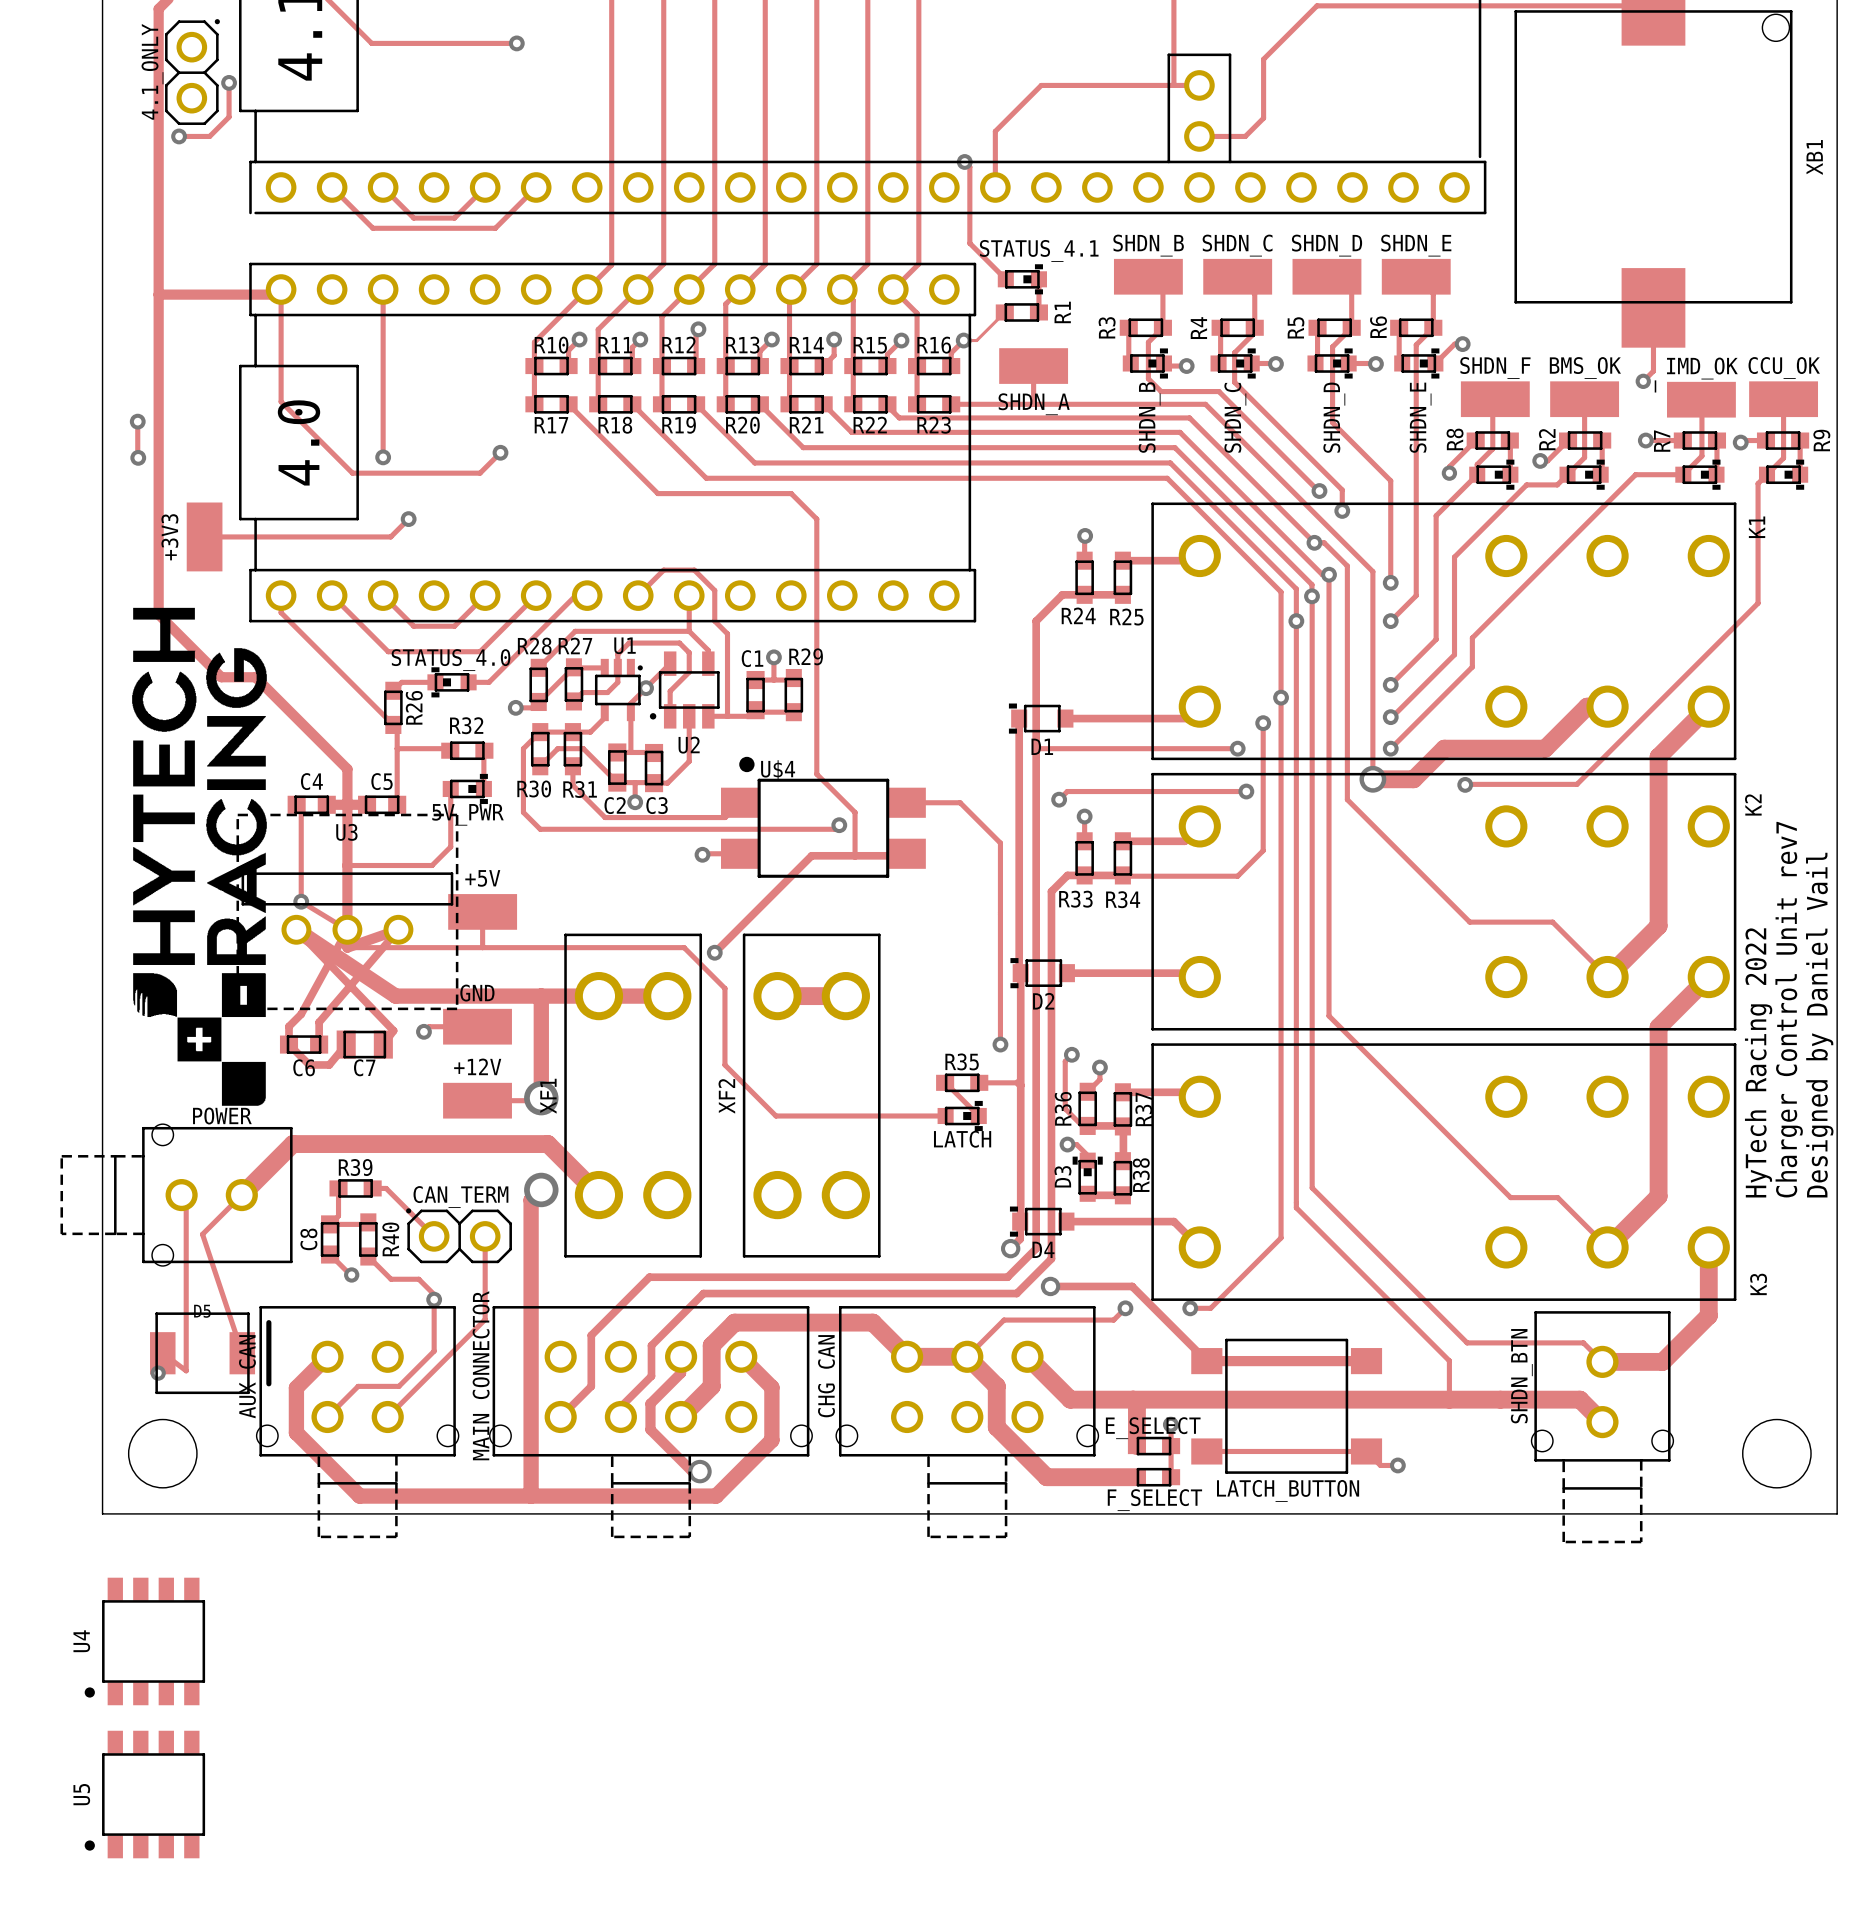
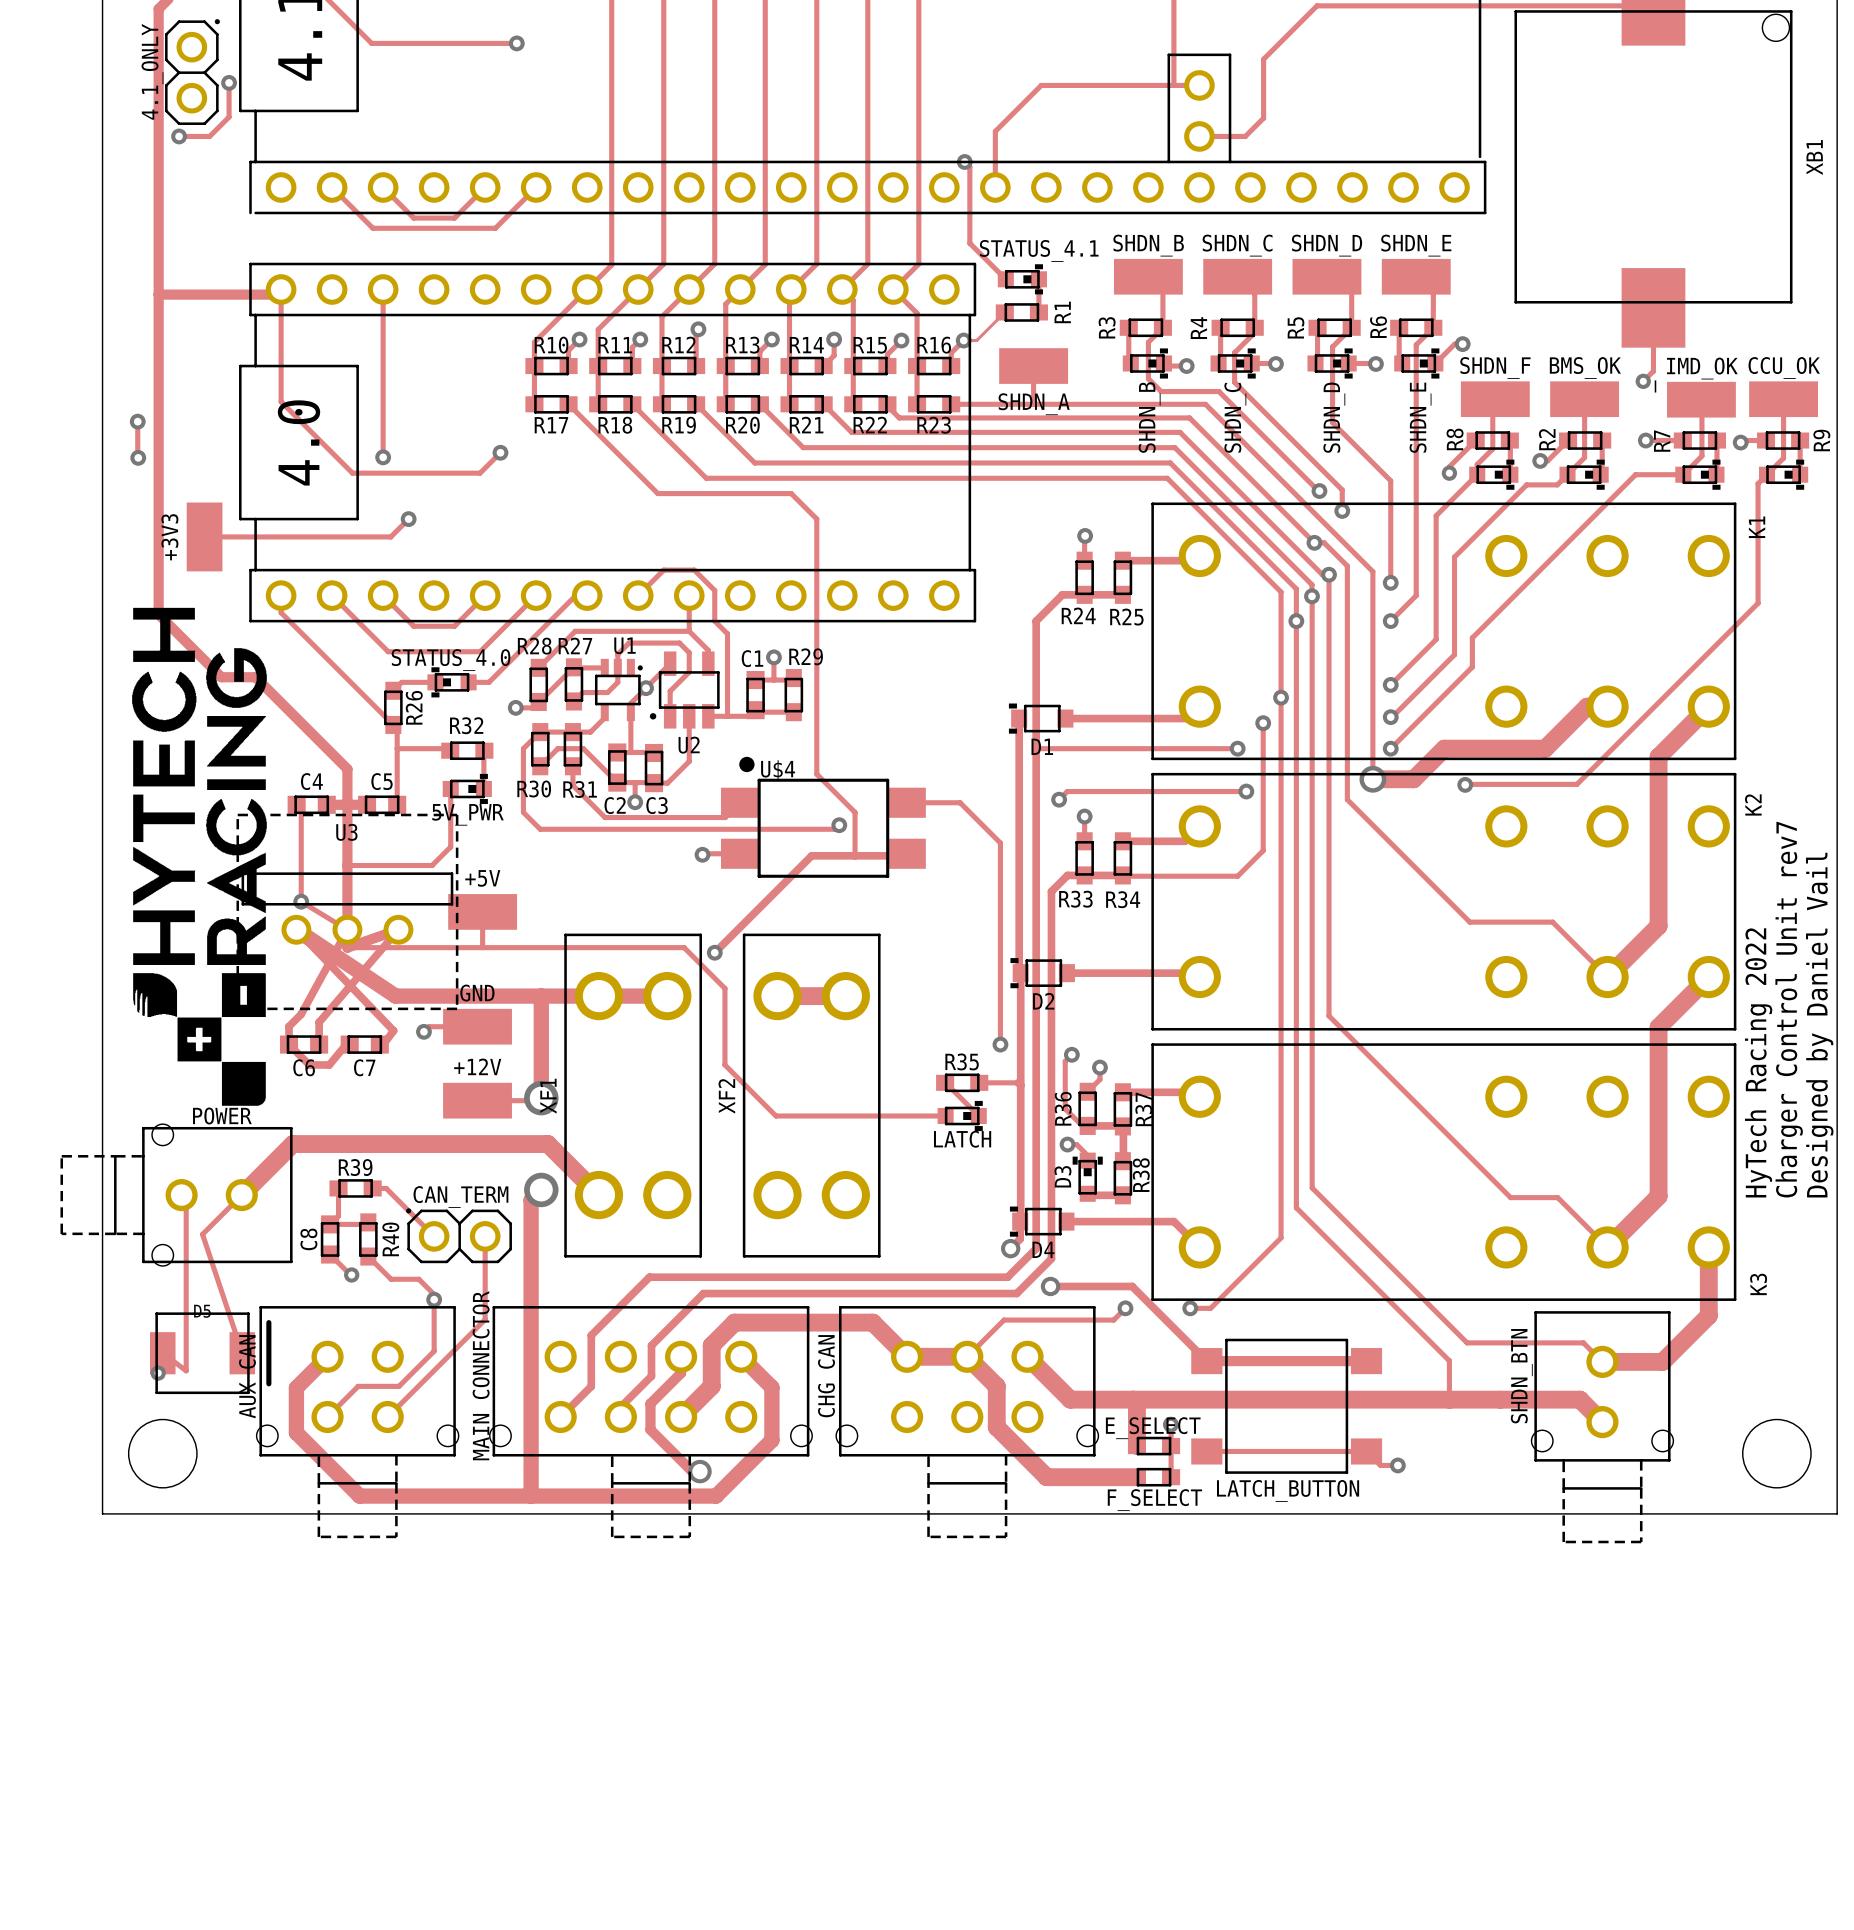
C7 footprint: [336, 1030, 393, 1059] -> [340, 1035, 389, 1054]
U4: (144, 1641) -> none
U5: (144, 1794) -> none

